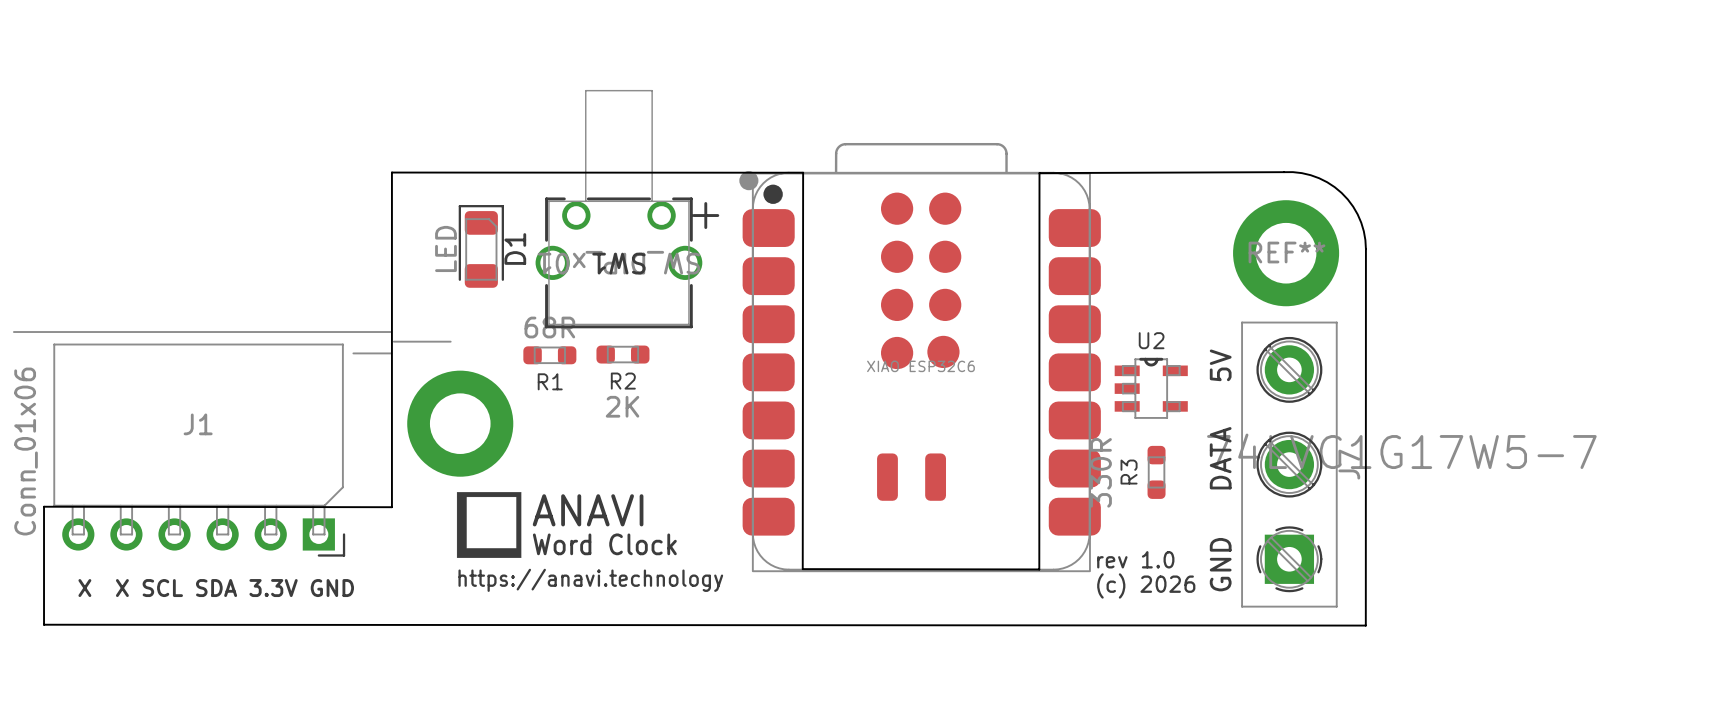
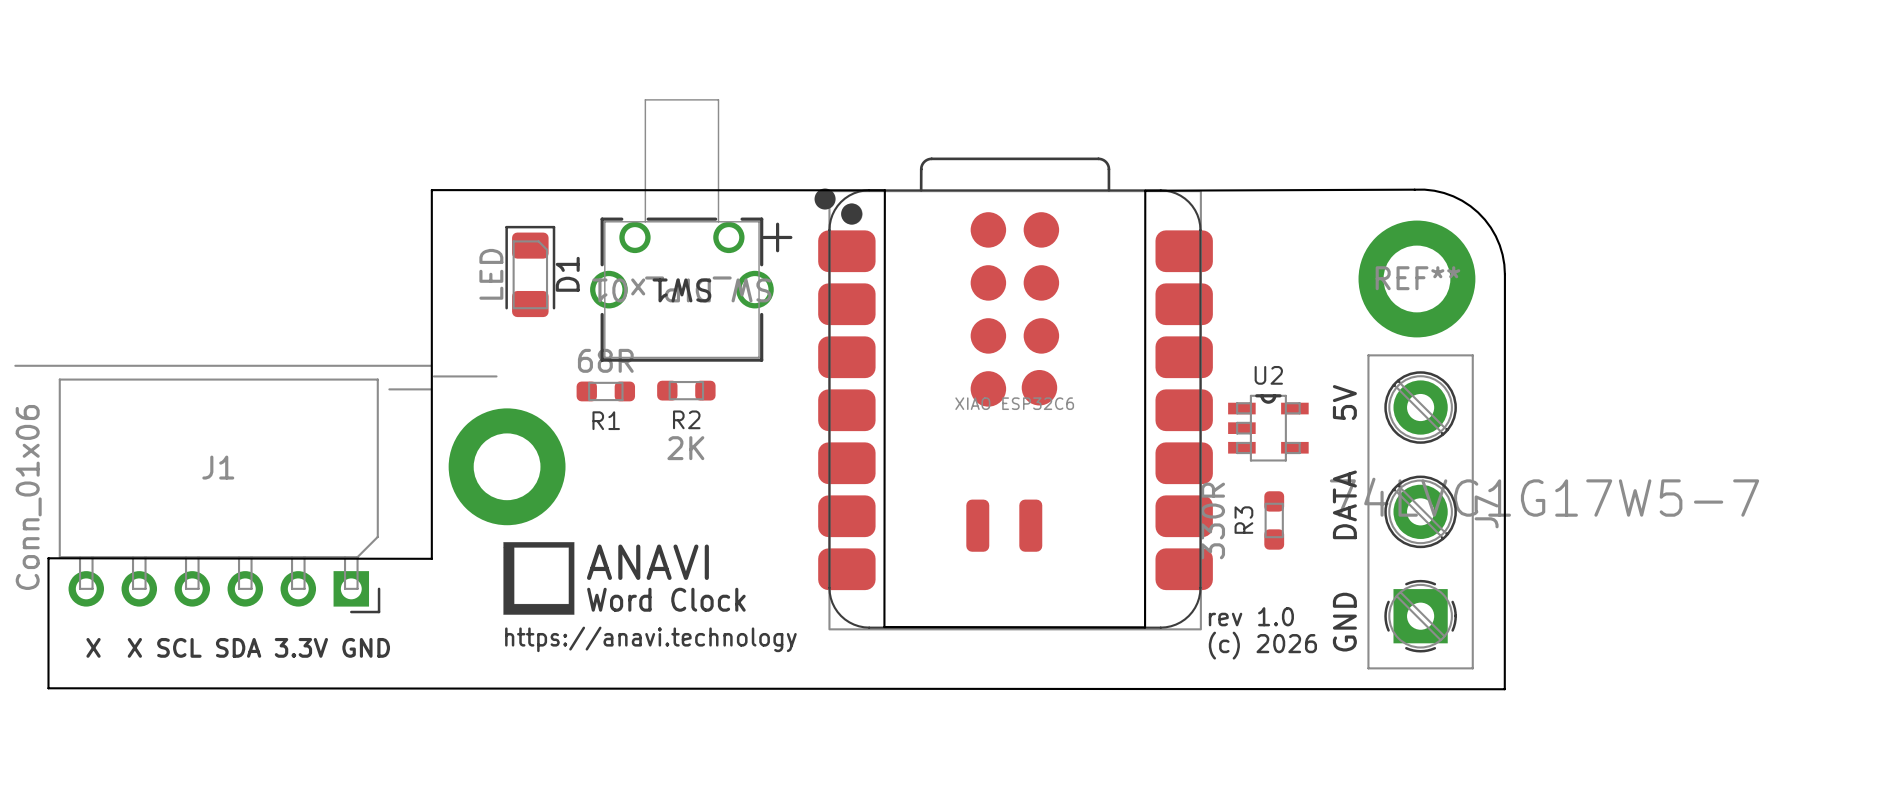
part footprint: [739, 142, 1101, 573] -> [814, 157, 1213, 631]

